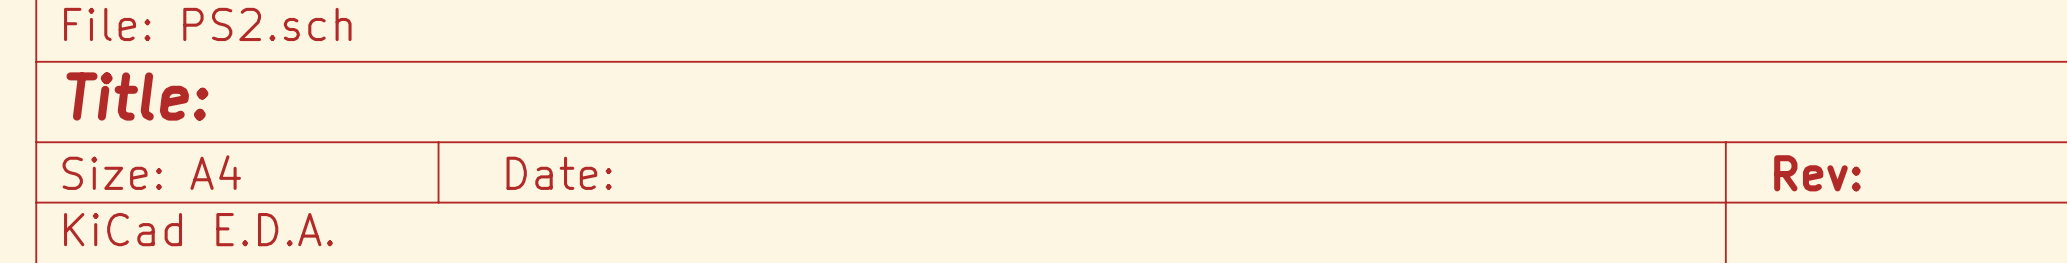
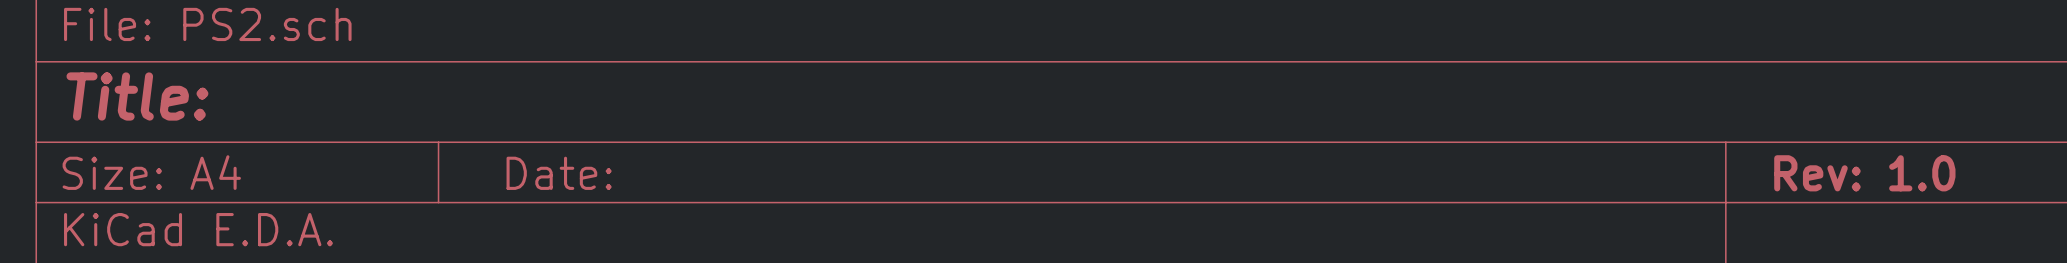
title block: Rev: (1817, 173) -> Rev: 1.0 (1864, 173)

